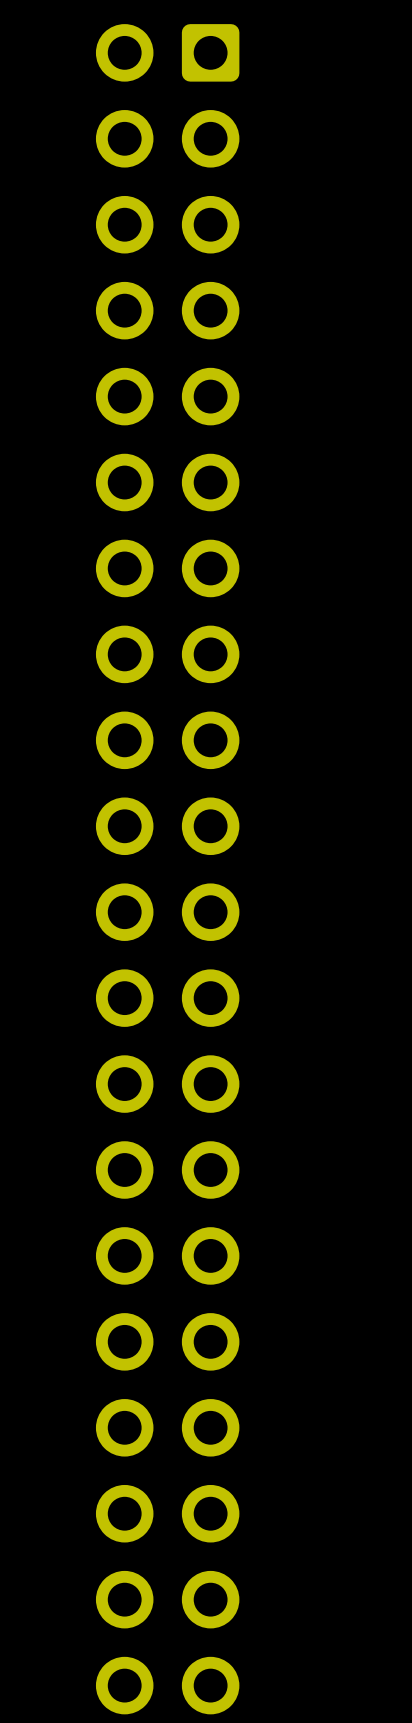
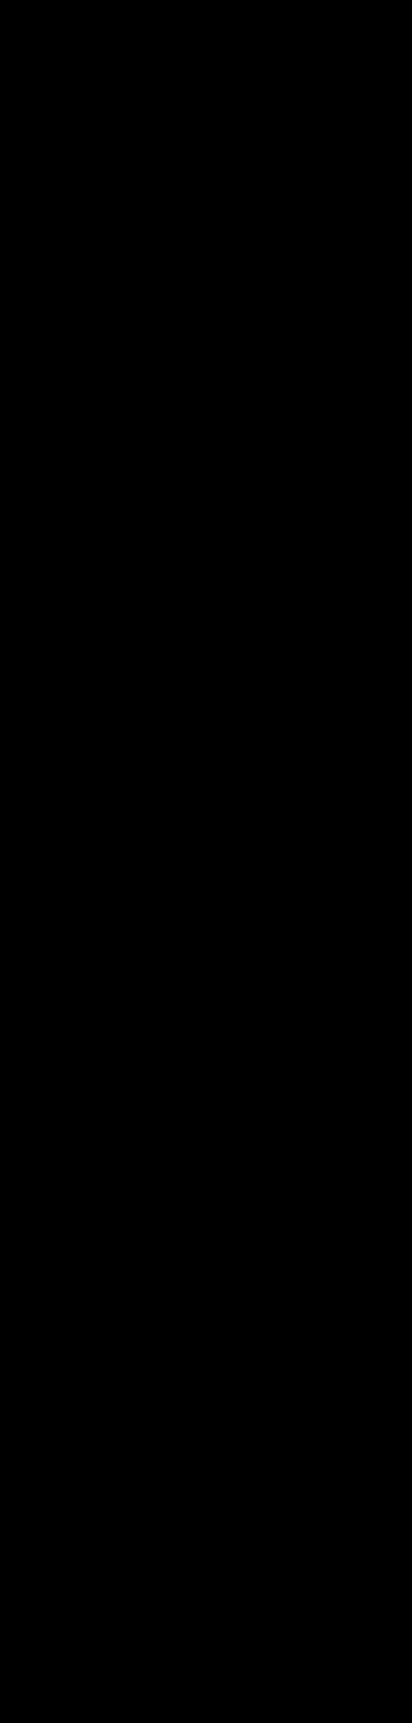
part: (167, 869) -> none

